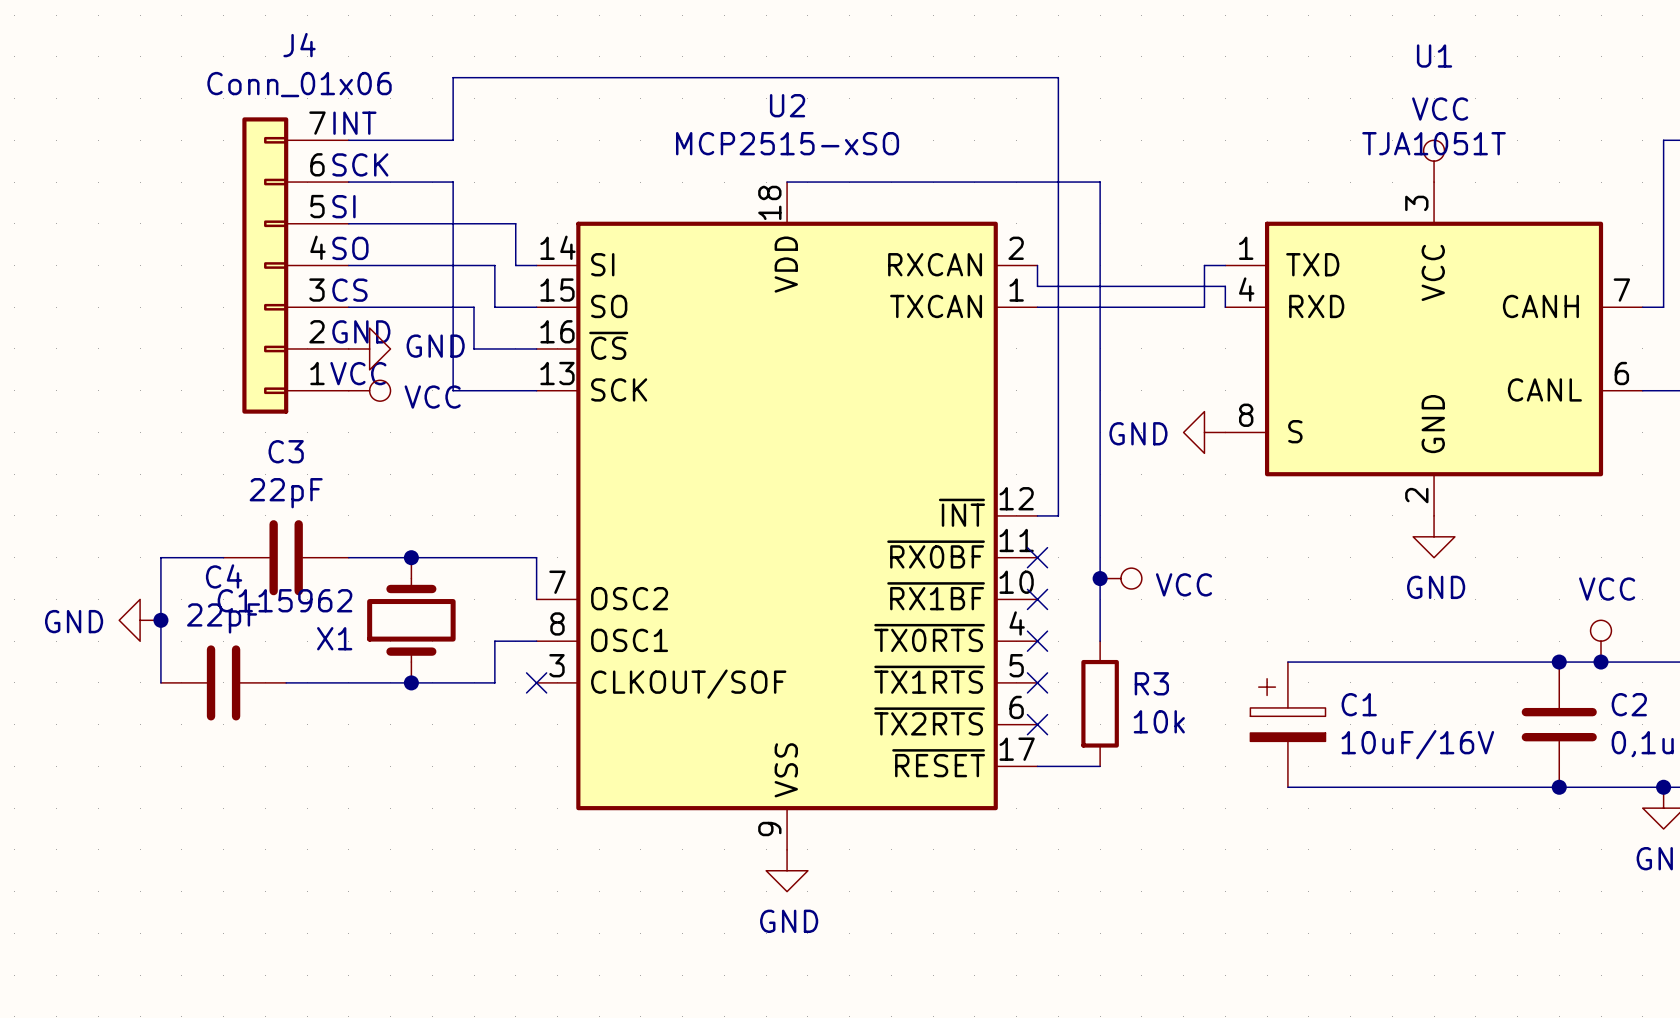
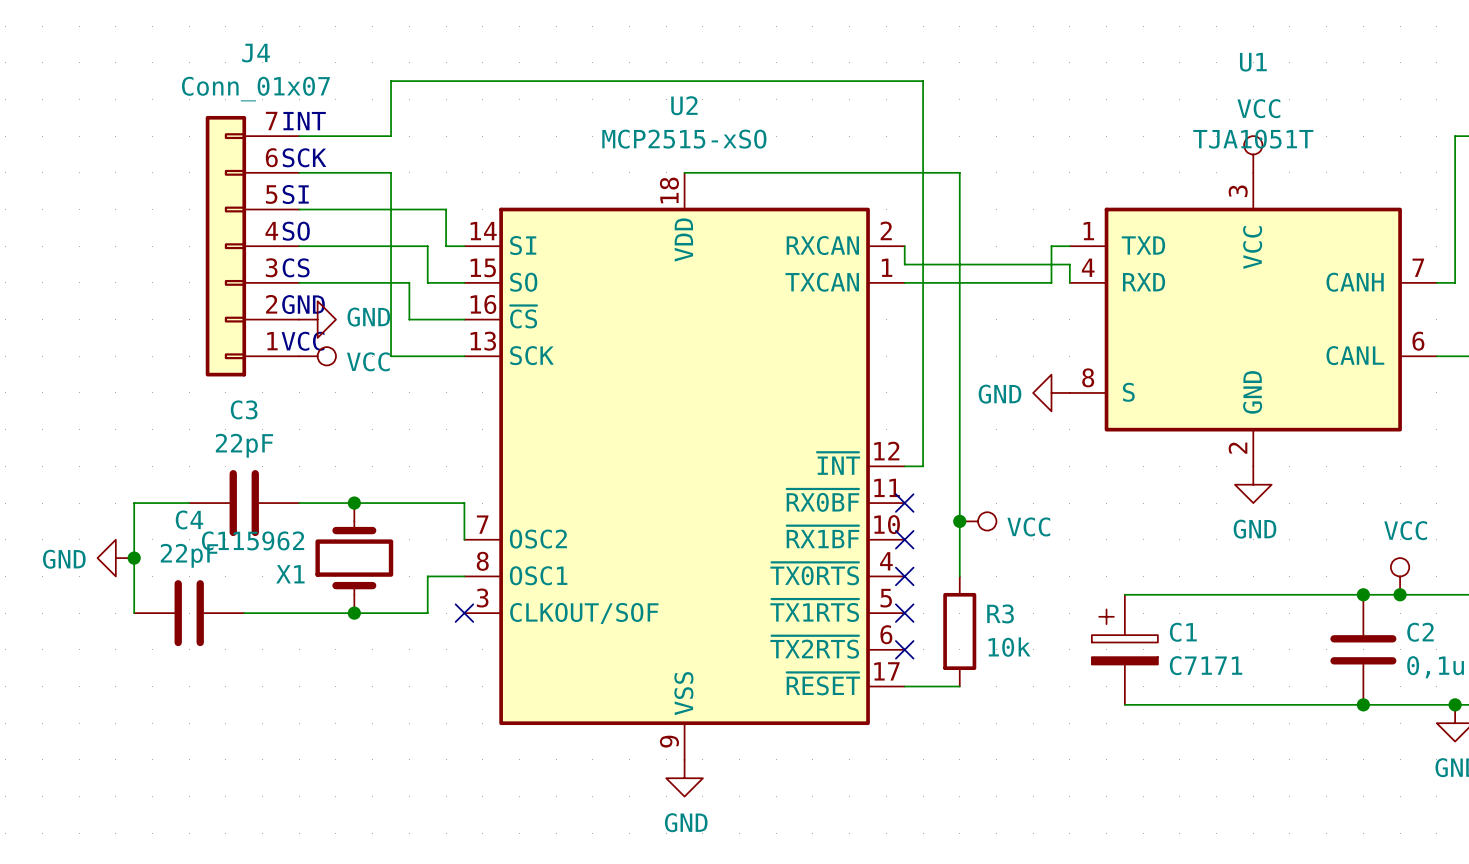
J4 value: Conn_01x06 (299, 84) -> Conn_01x07 (255, 89)
C1 value: 10uF/16V (1417, 744) -> C7171 (1206, 665)

